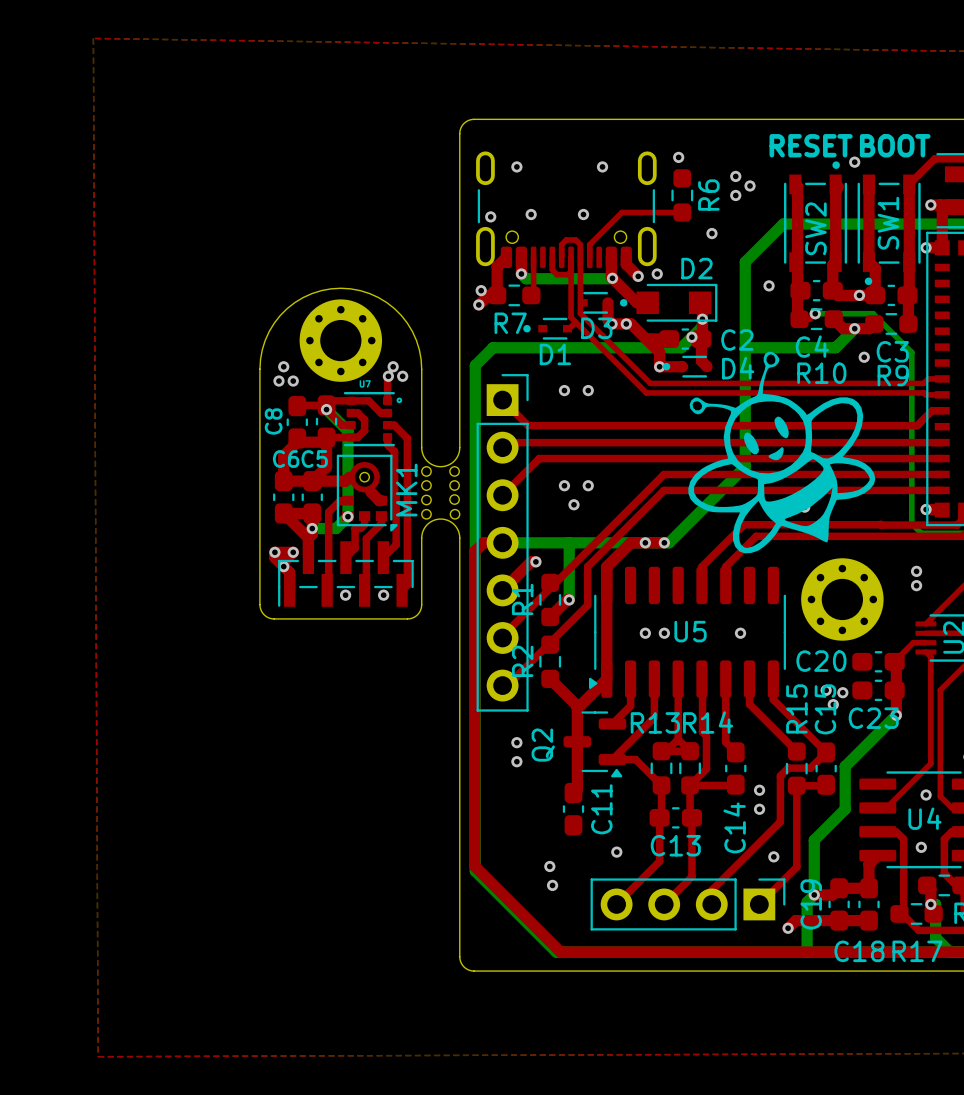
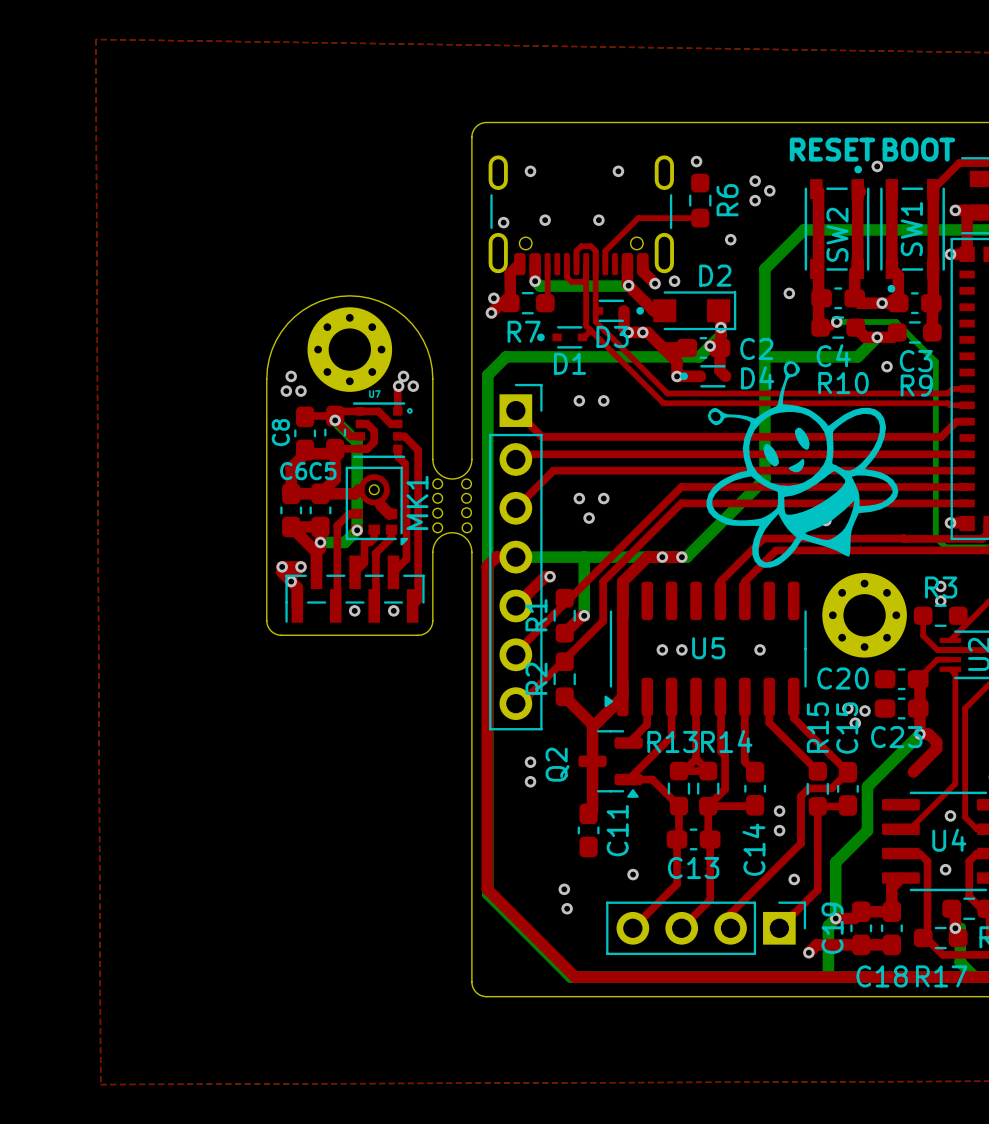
R3: none -> (940, 615)
top track: none -> (923, 620) (923, 635) (937, 650) (950, 650)
top track: none -> (919, 734) (928, 734) (936, 742) (936, 748) (913, 772)

